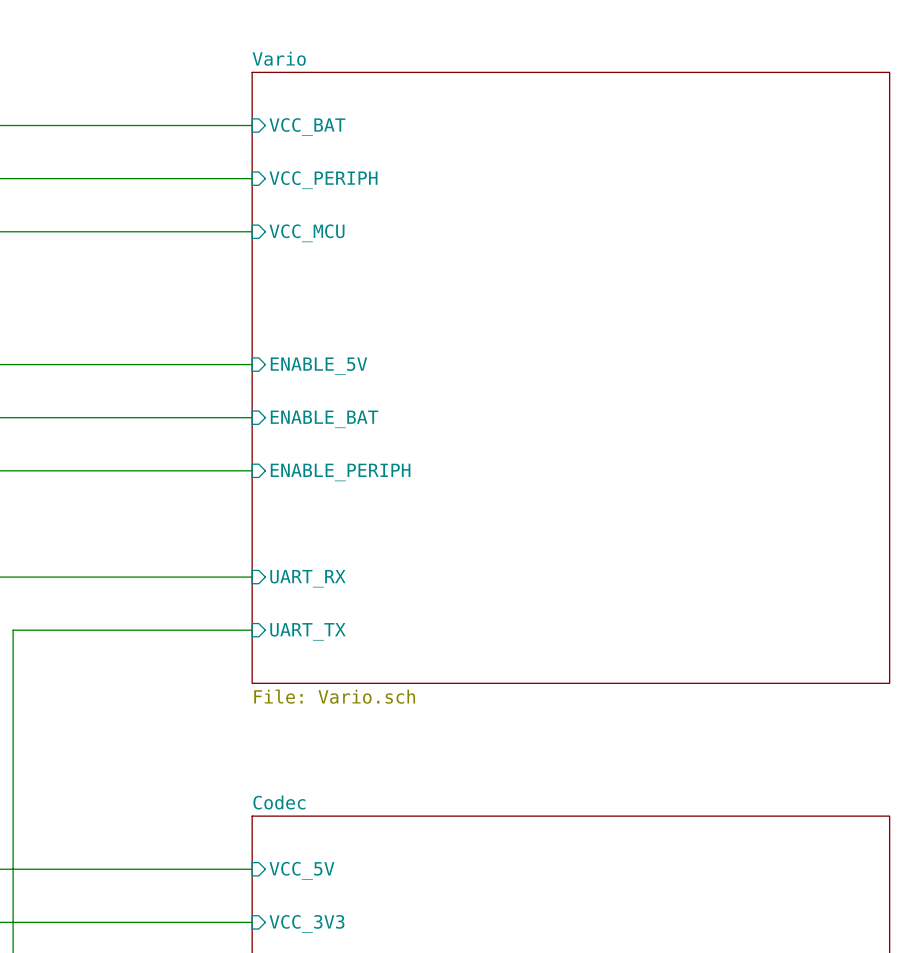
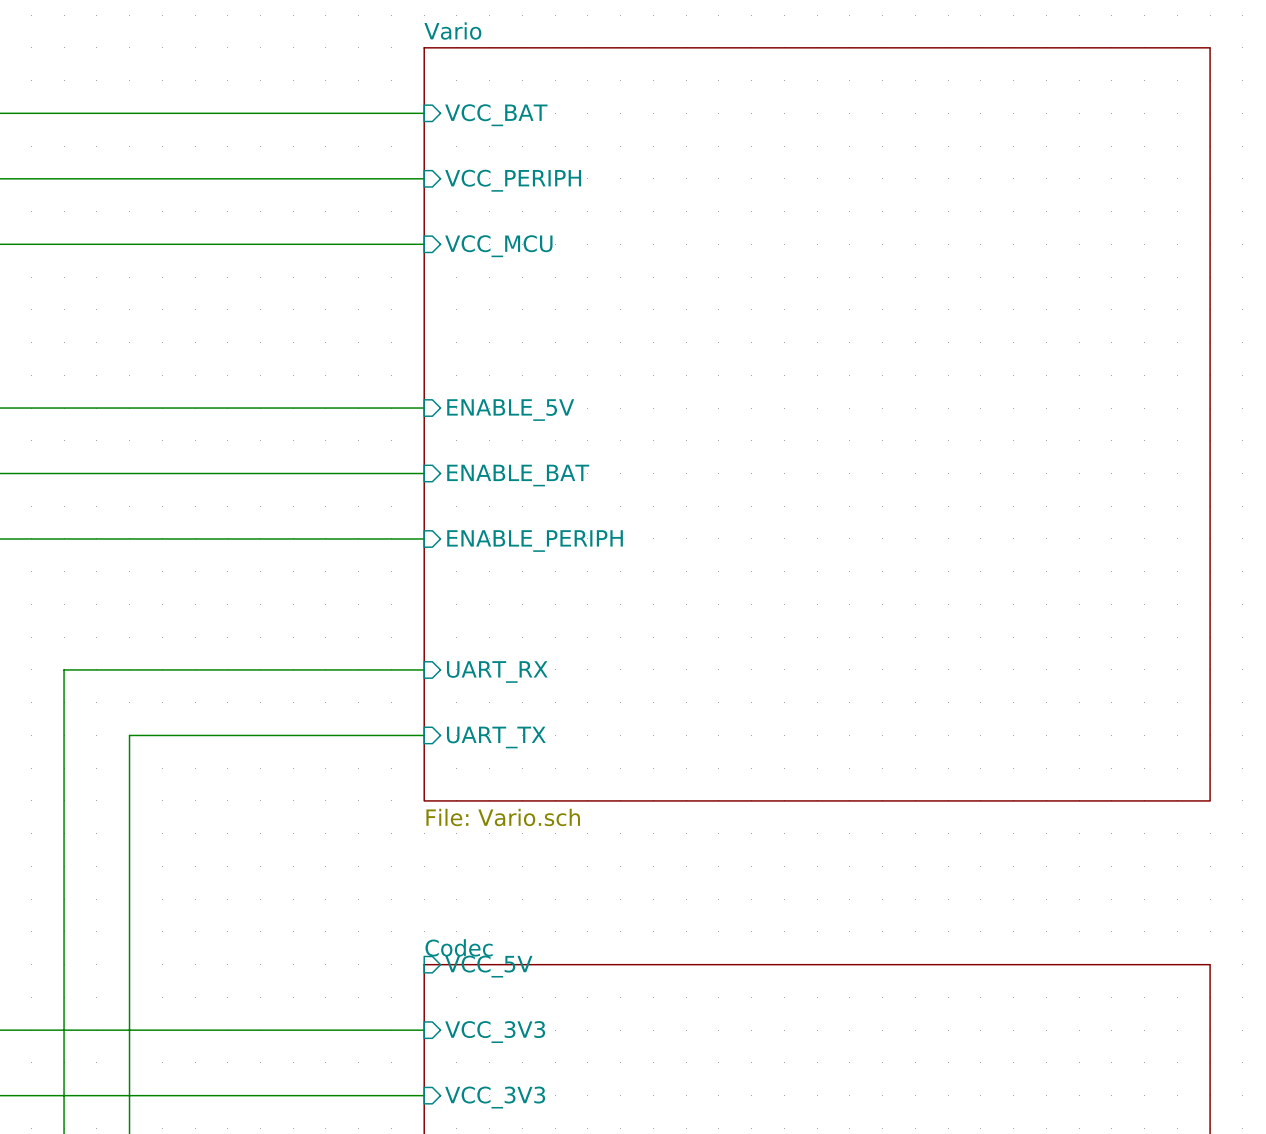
sheet pin: none -> VCC_5V (488, 966)
sheet pin: VCC_5V (301, 870) -> VCC_3V3 (495, 1032)

